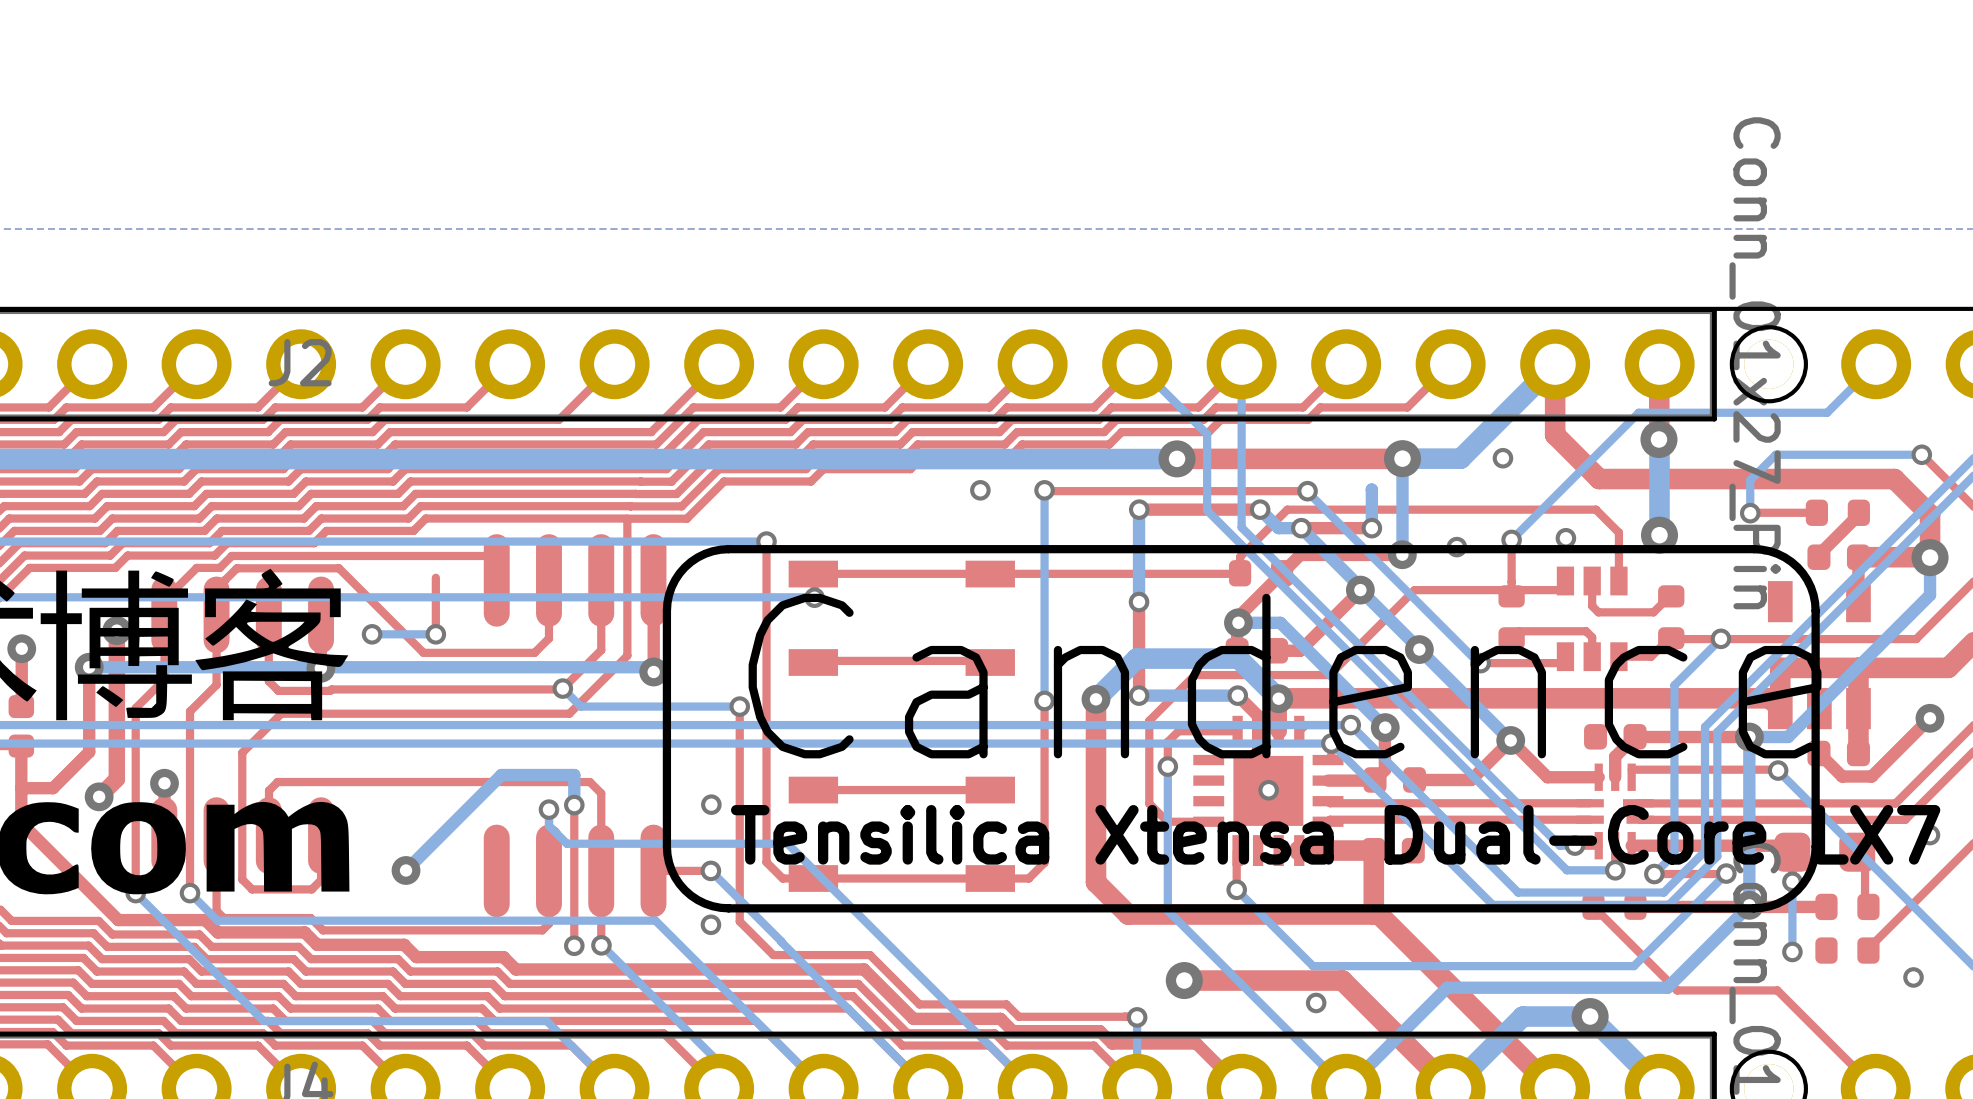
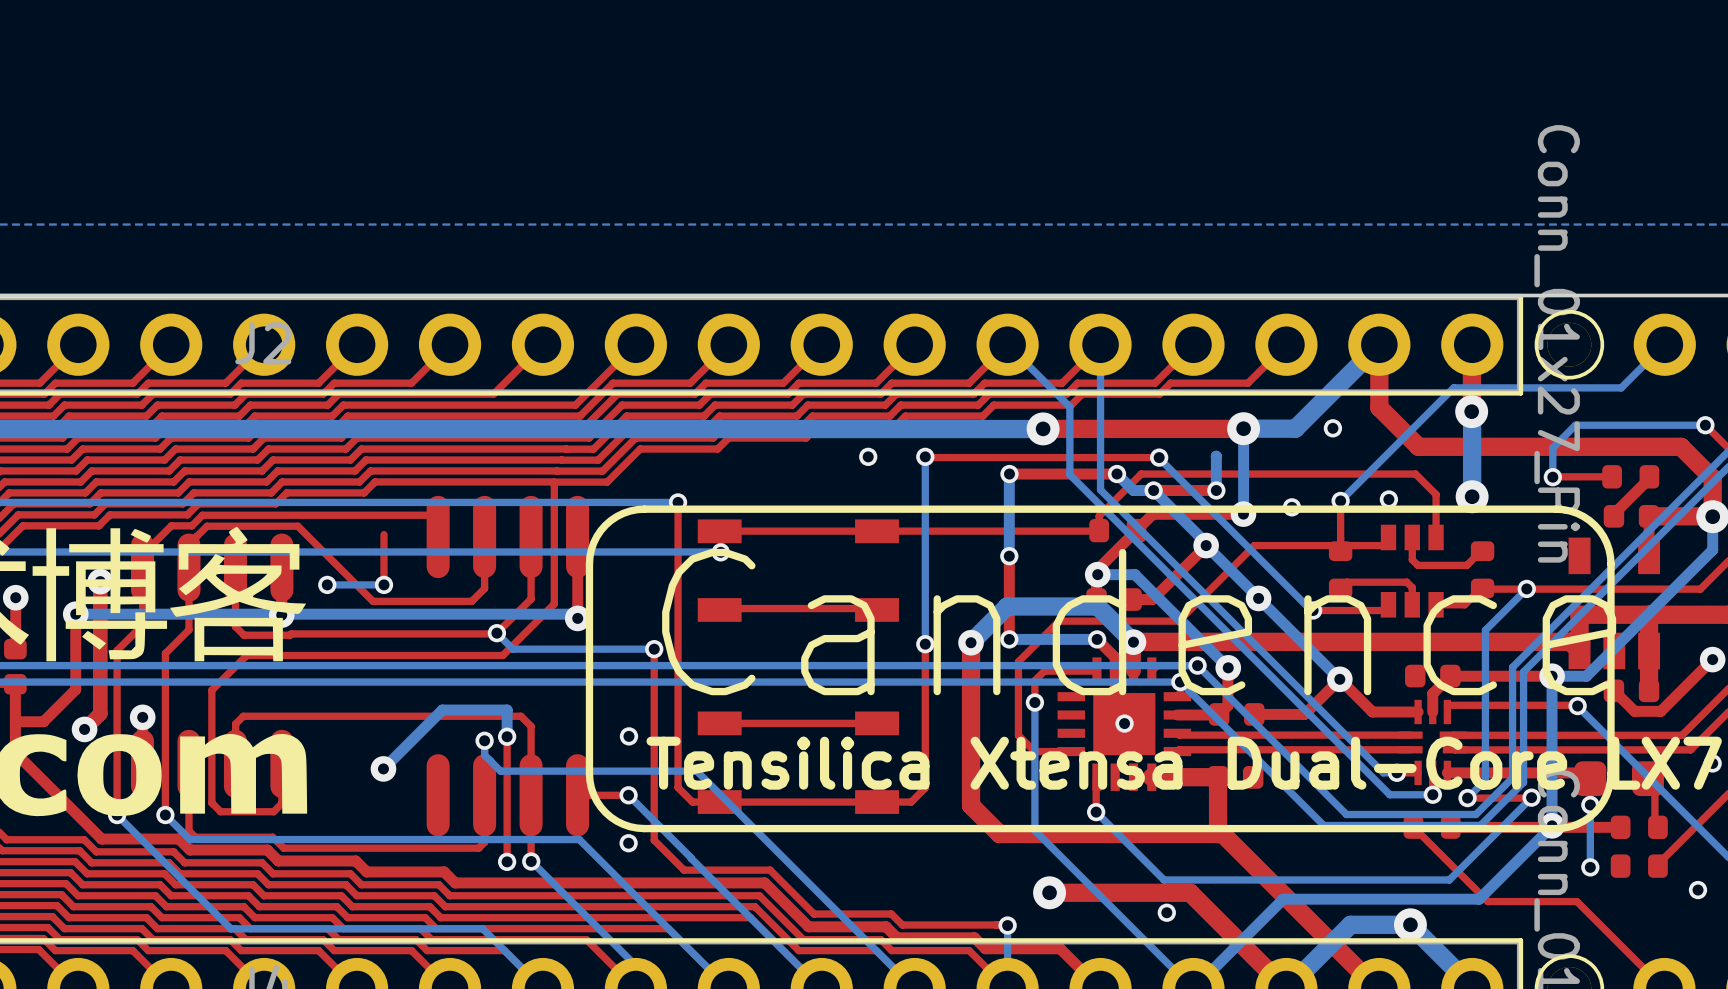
bottom track: (435, 841) (406, 870) -> none
via position: (406, 870) -> (383, 768)

